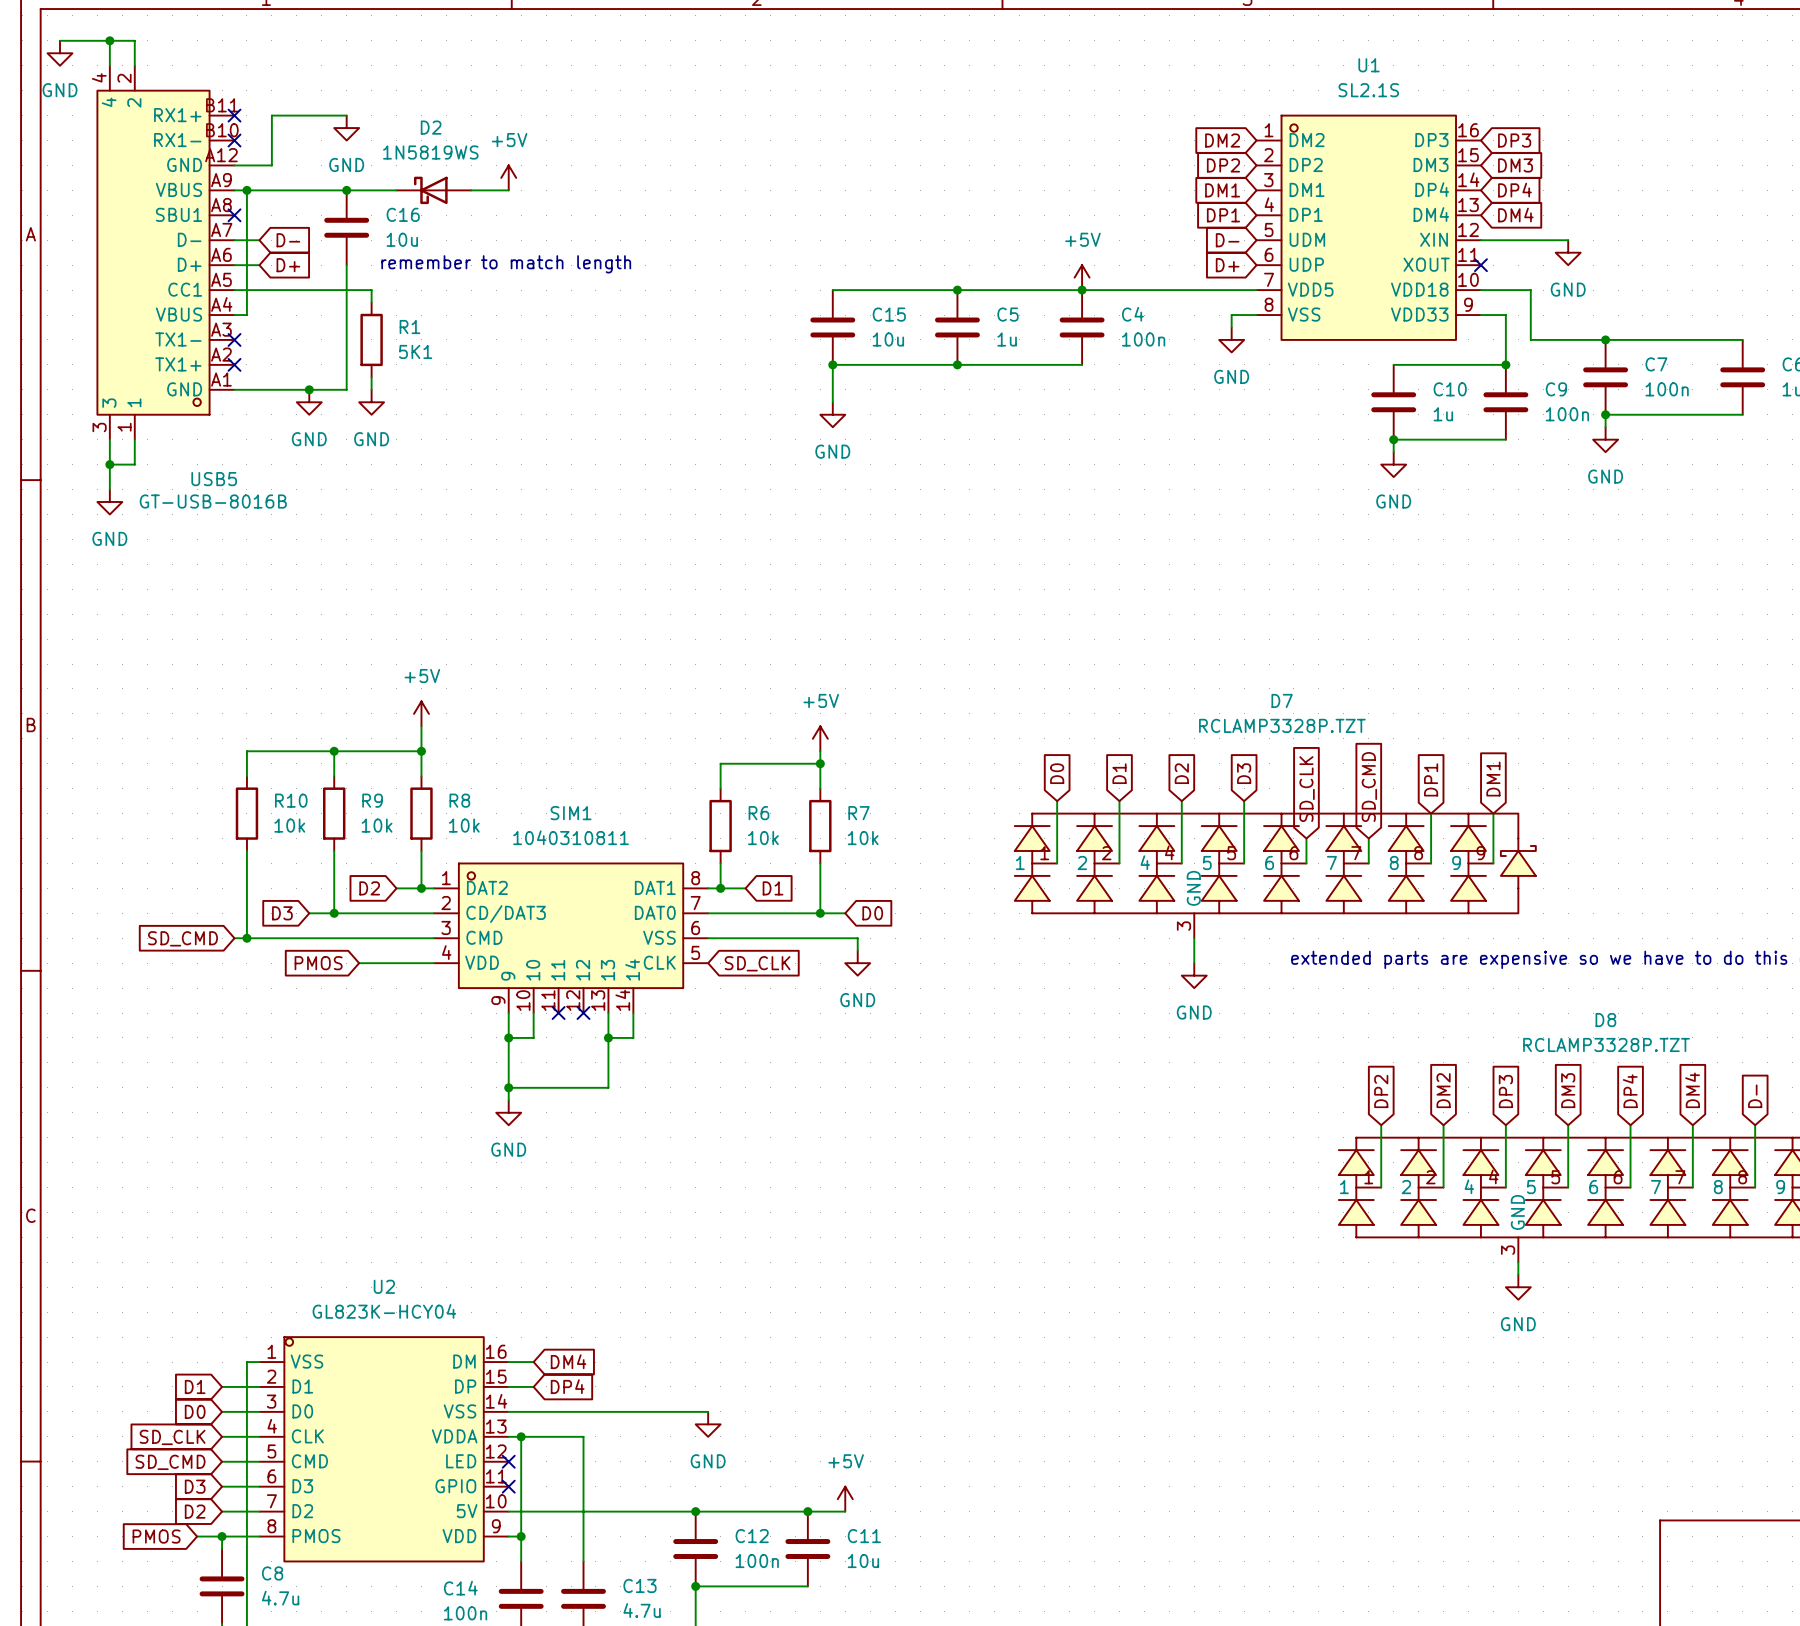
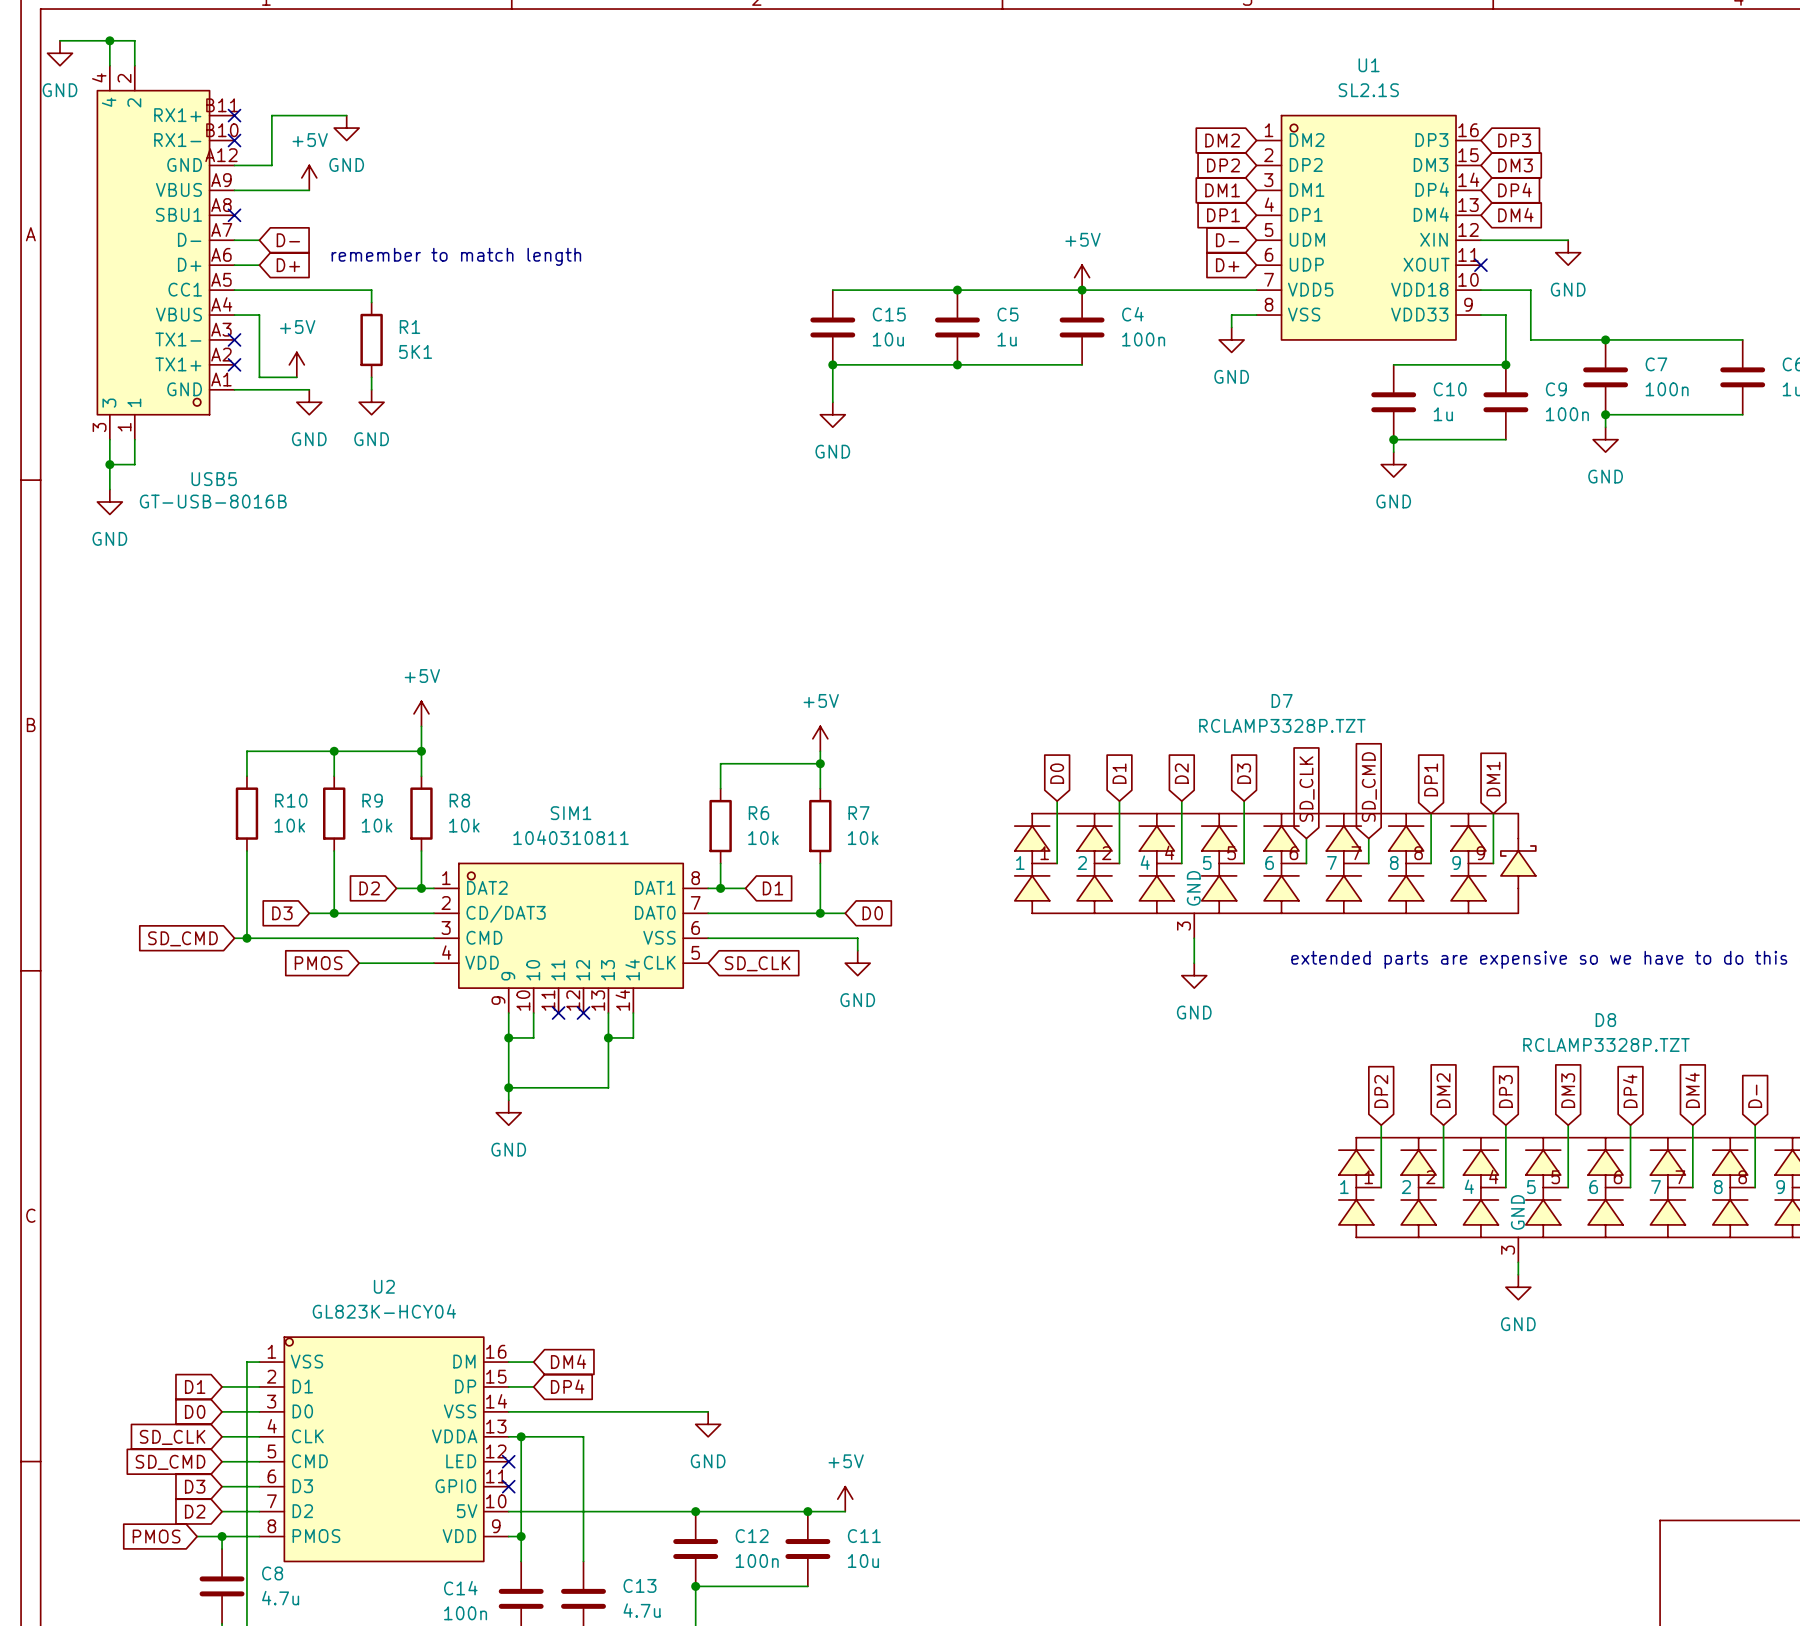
power symbol: none -> +5V (309, 177)
power symbol: +5V (508, 177) -> none
wire: (246, 190) (246, 315) -> (296, 377) (259, 377) (259, 315) (246, 315)
junction: (246, 190) -> none
wire: (309, 190) (396, 190) -> none
junction: (346, 190) -> none
D2: 1N5819WS (433, 190) -> none
wire: (471, 190) (508, 190) -> none
C16: 10u (346, 227) -> none
text position: remember to match length (506, 264) -> remember to match length (456, 256)
wire: (346, 265) (346, 389) (309, 389) -> none
power symbol: none -> +5V (296, 364)
junction: (309, 389) -> none

